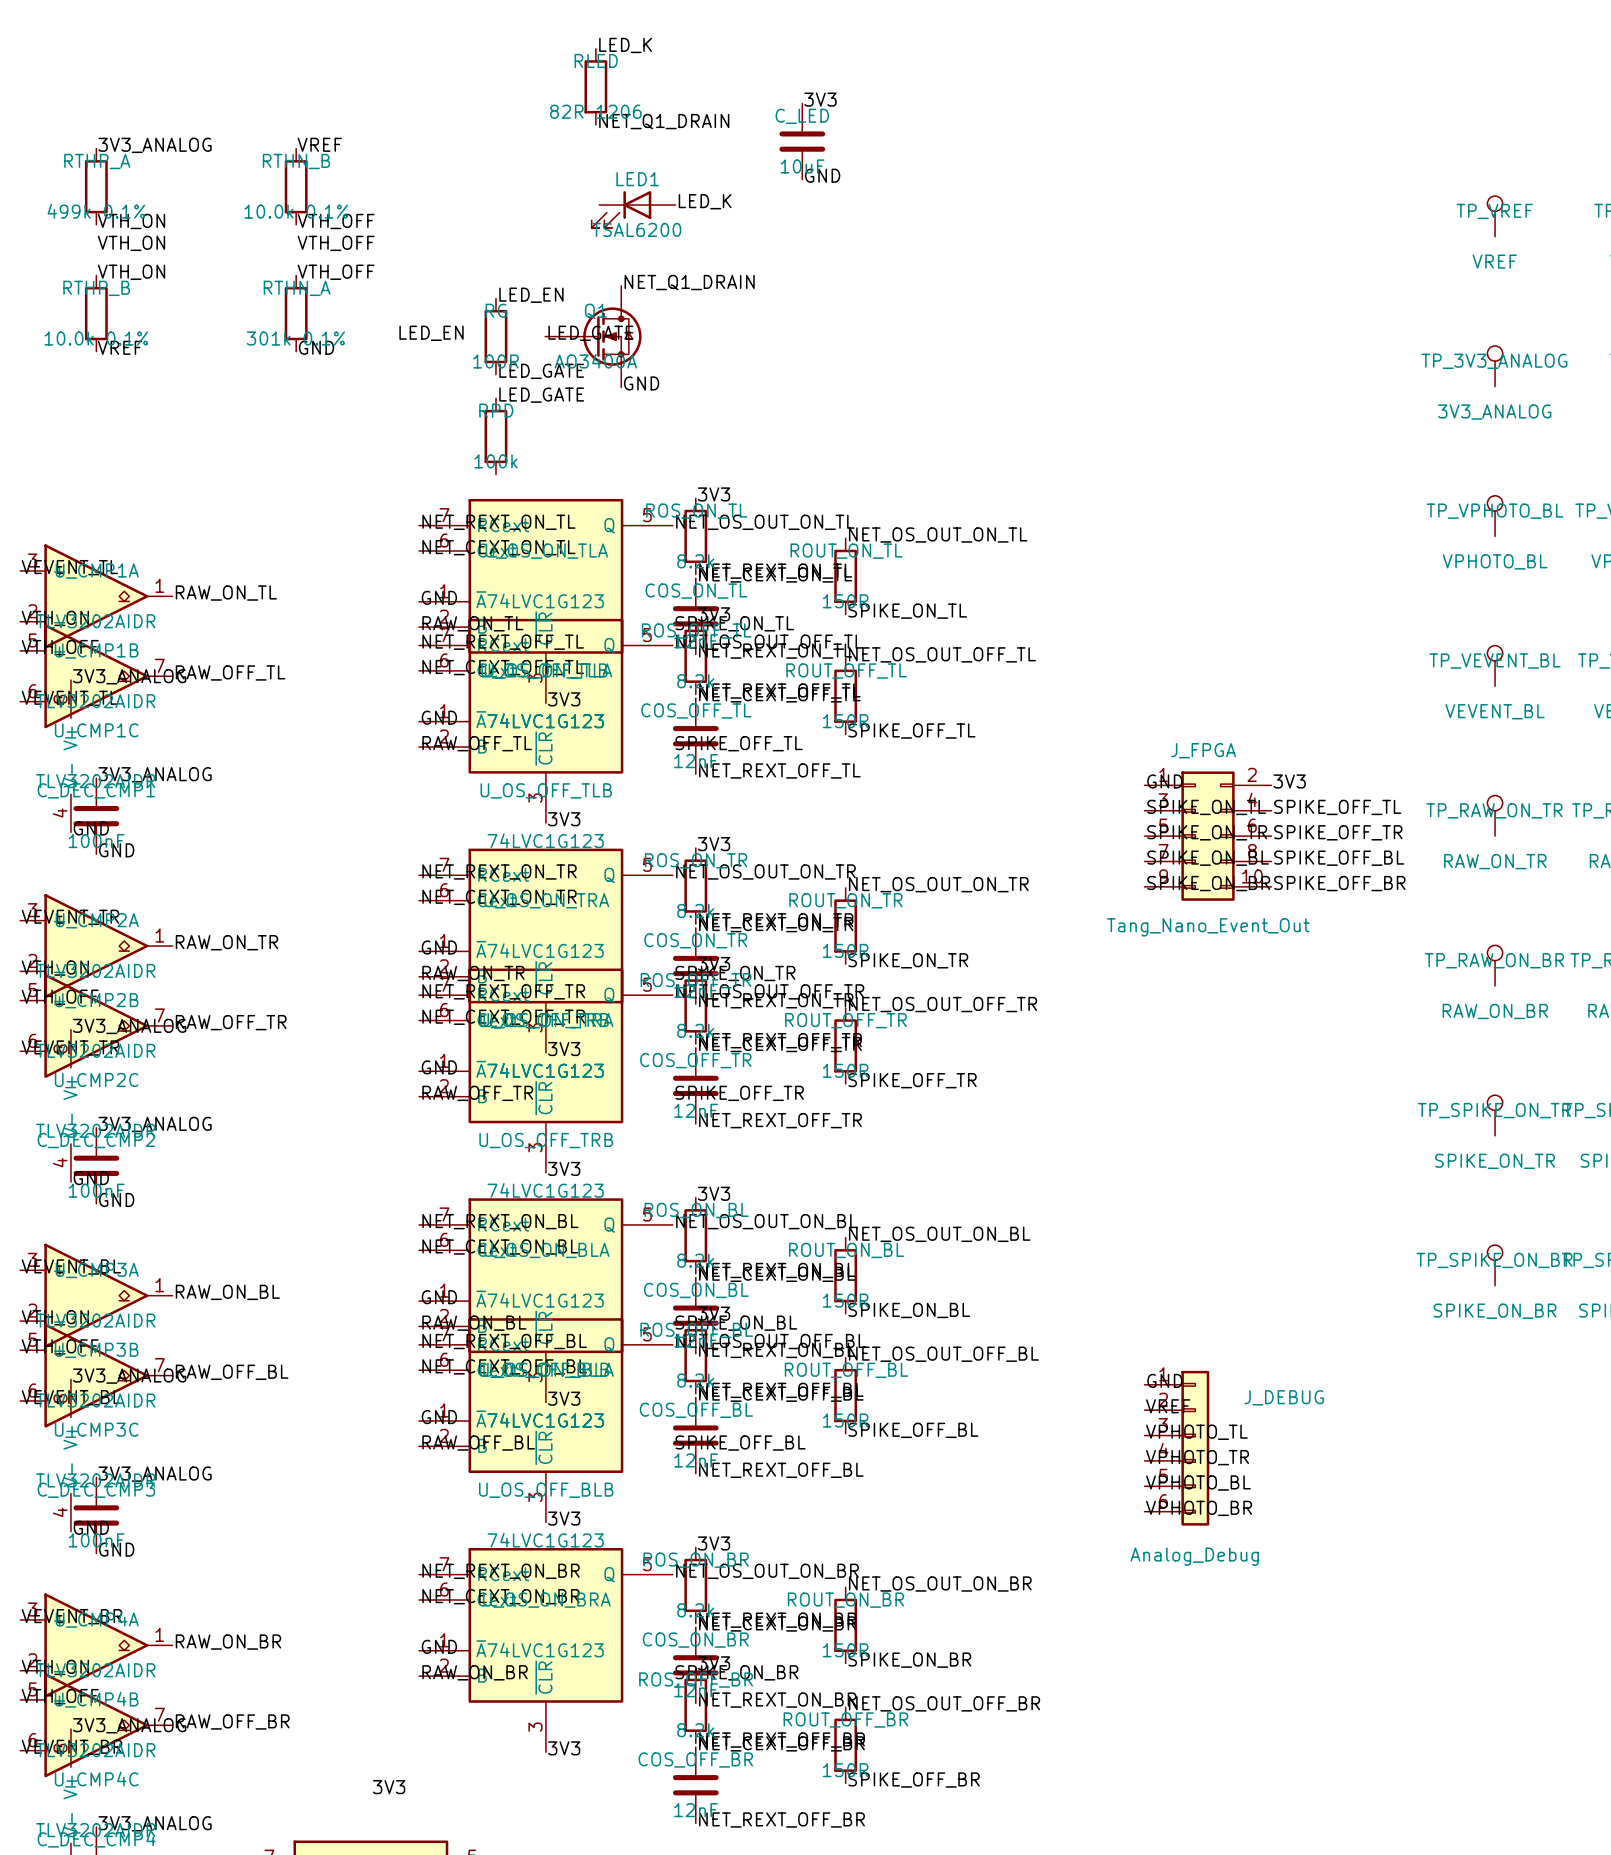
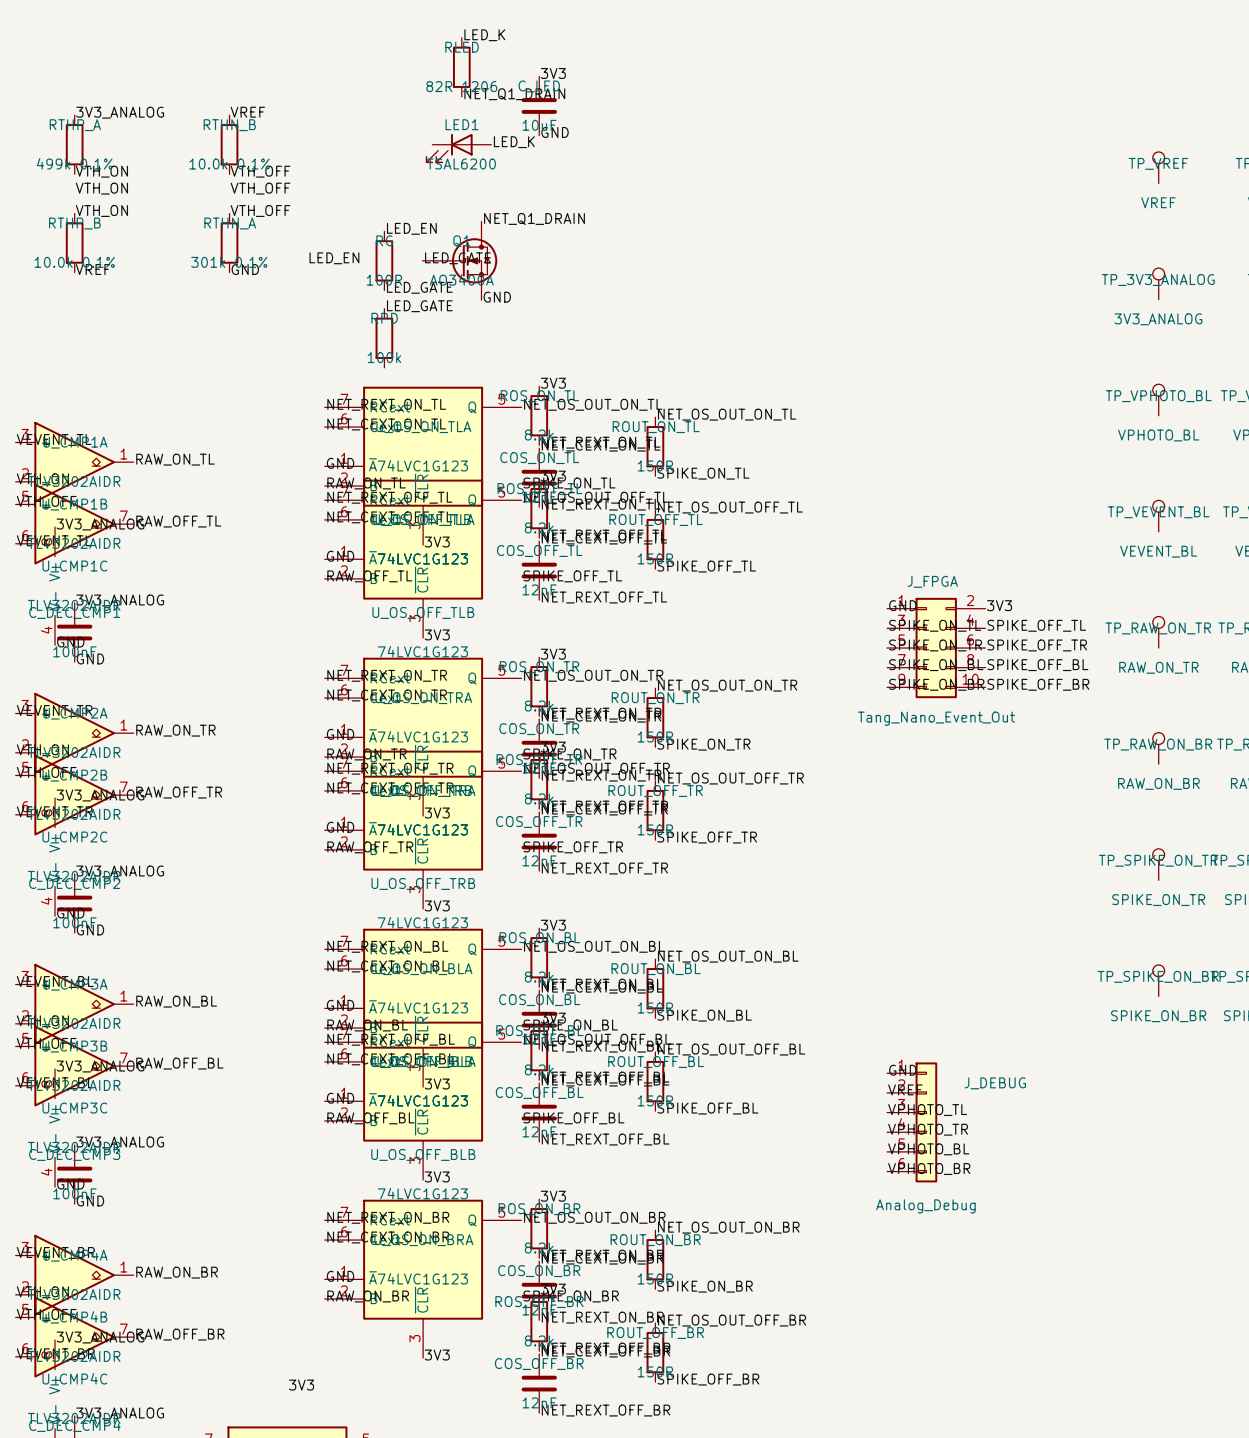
label position: 3V3 (820, 99) -> 3V3 (553, 73)
C_LED position: (802, 141) -> (539, 106)
label position: GND (822, 175) -> GND (555, 132)
label position: LED_K (705, 201) -> LED_K (514, 142)
LED1 position: (633, 209) -> (458, 148)

